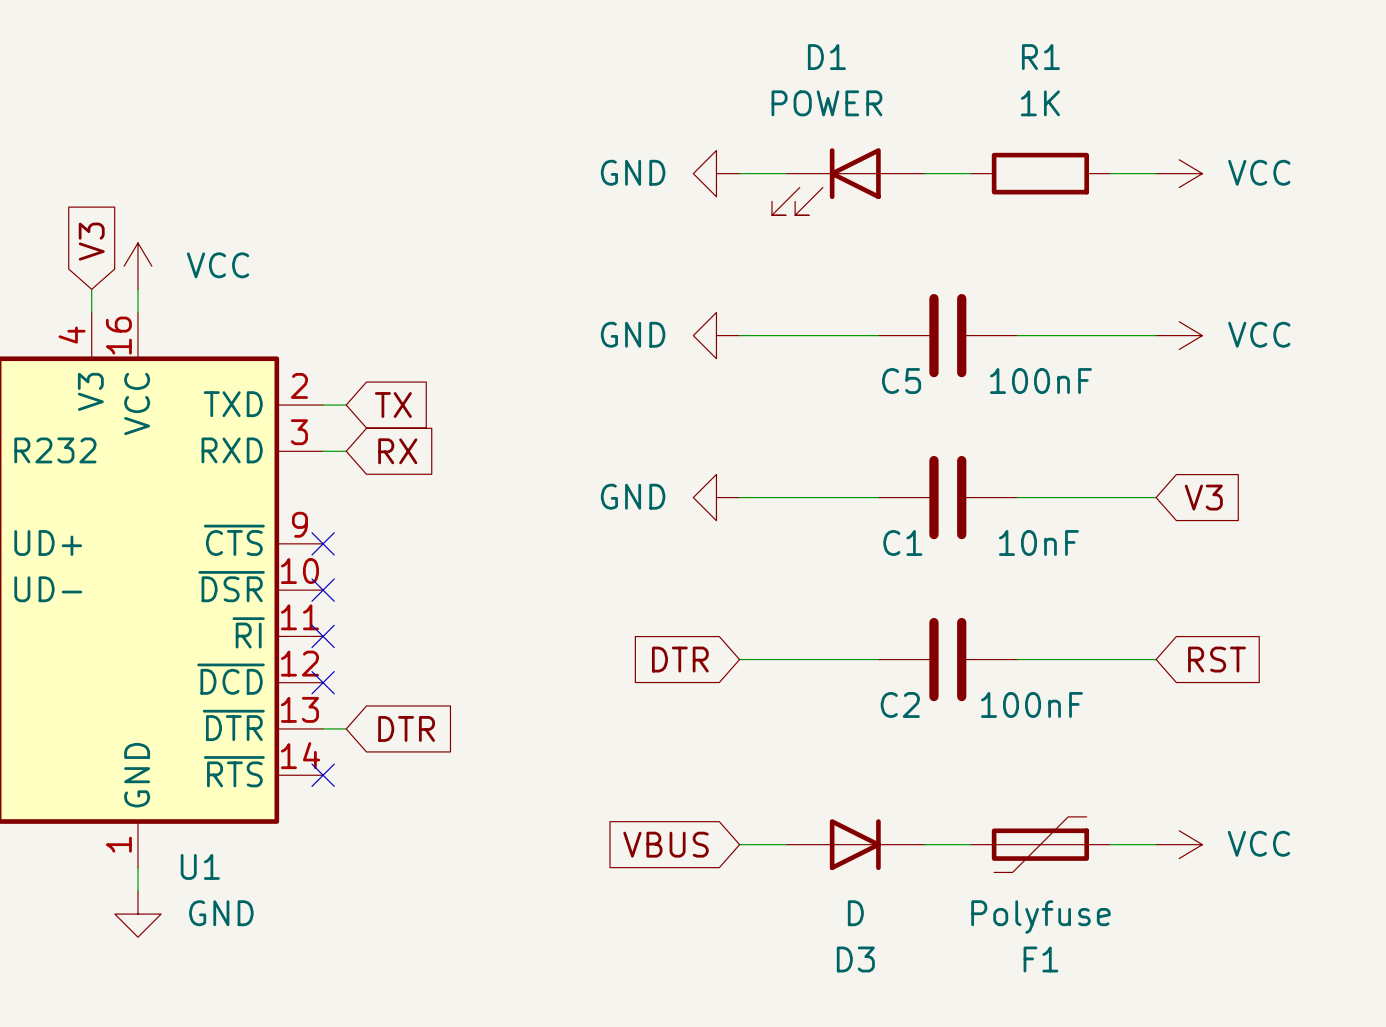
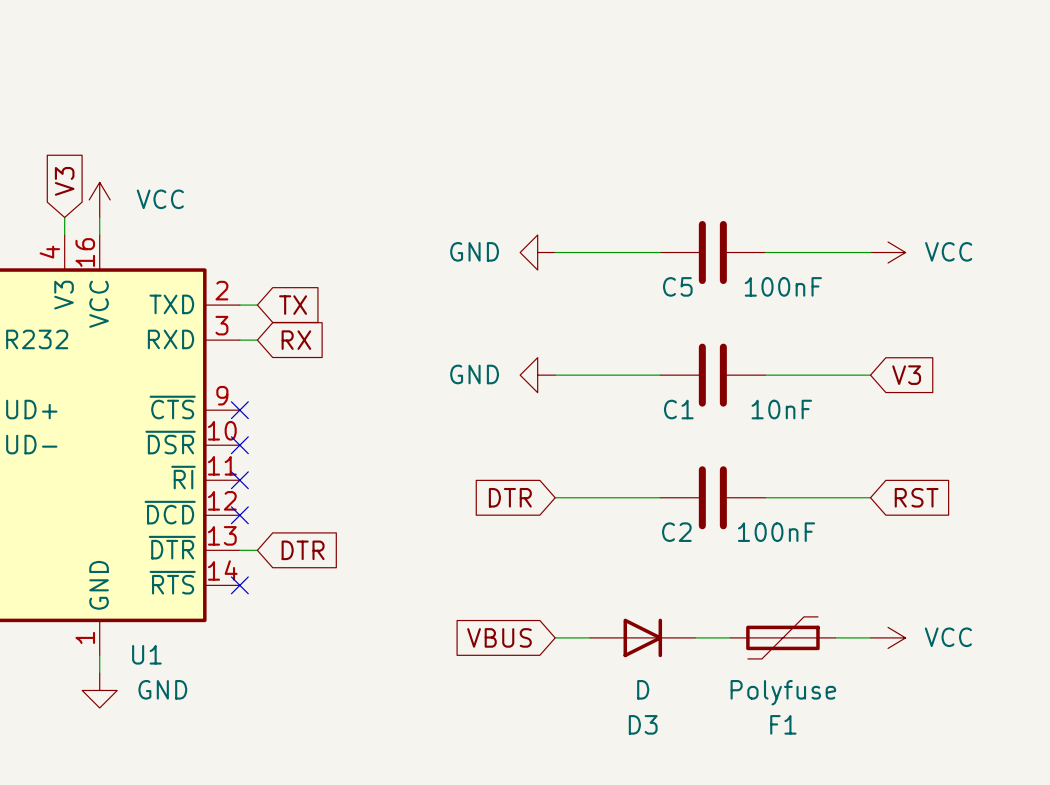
power symbol: GND (716, 173) -> none
wire: (739, 173) (785, 173) -> none
wire: (924, 173) (970, 173) -> none
R1: 1K (1040, 173) -> none
wire: (1109, 173) (1156, 173) -> none
power symbol: VCC (1179, 173) -> none
D1: POWER (848, 181) -> none

